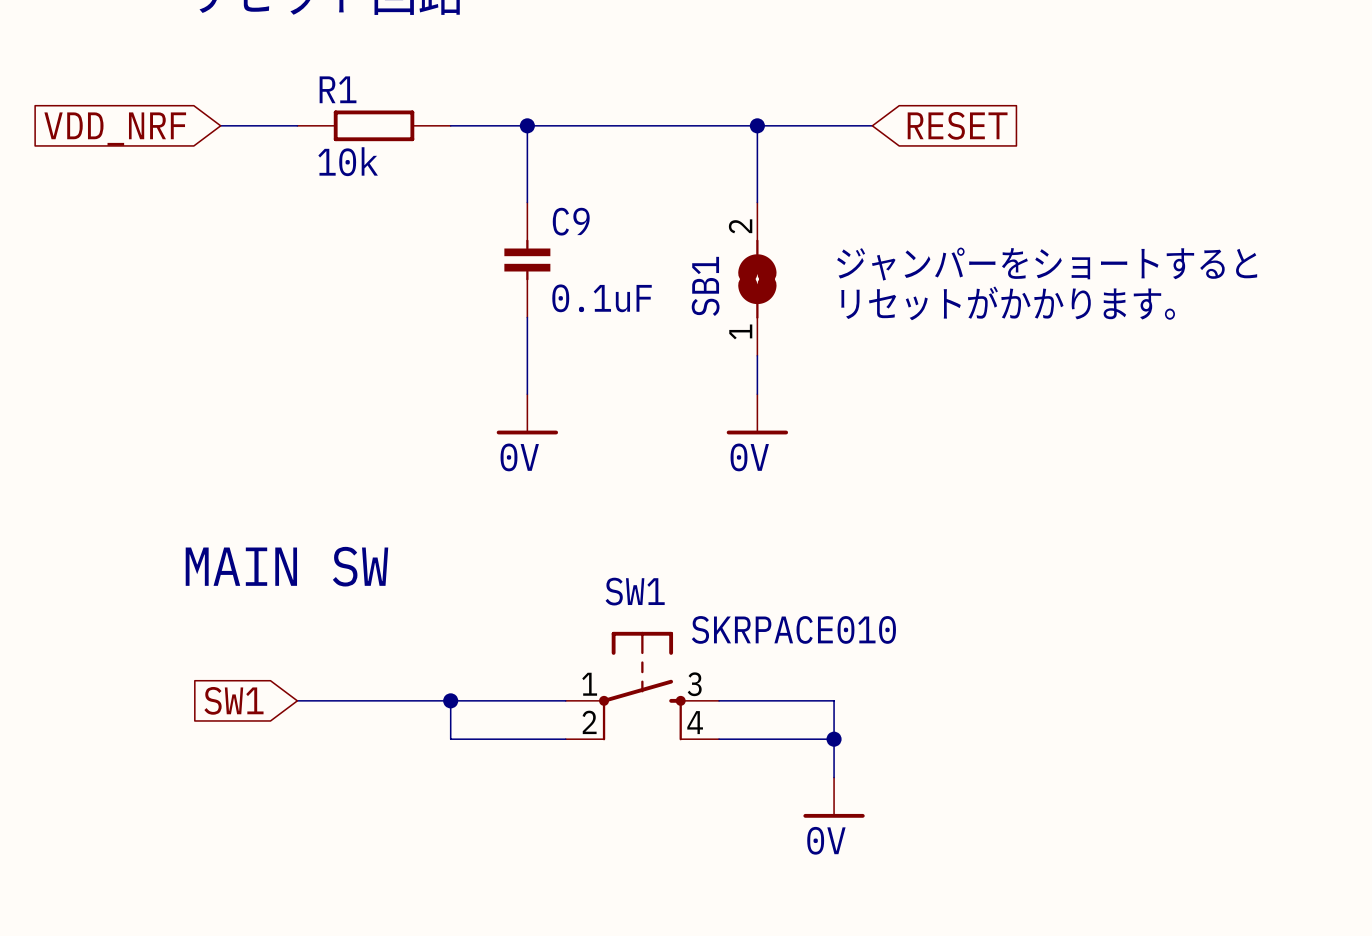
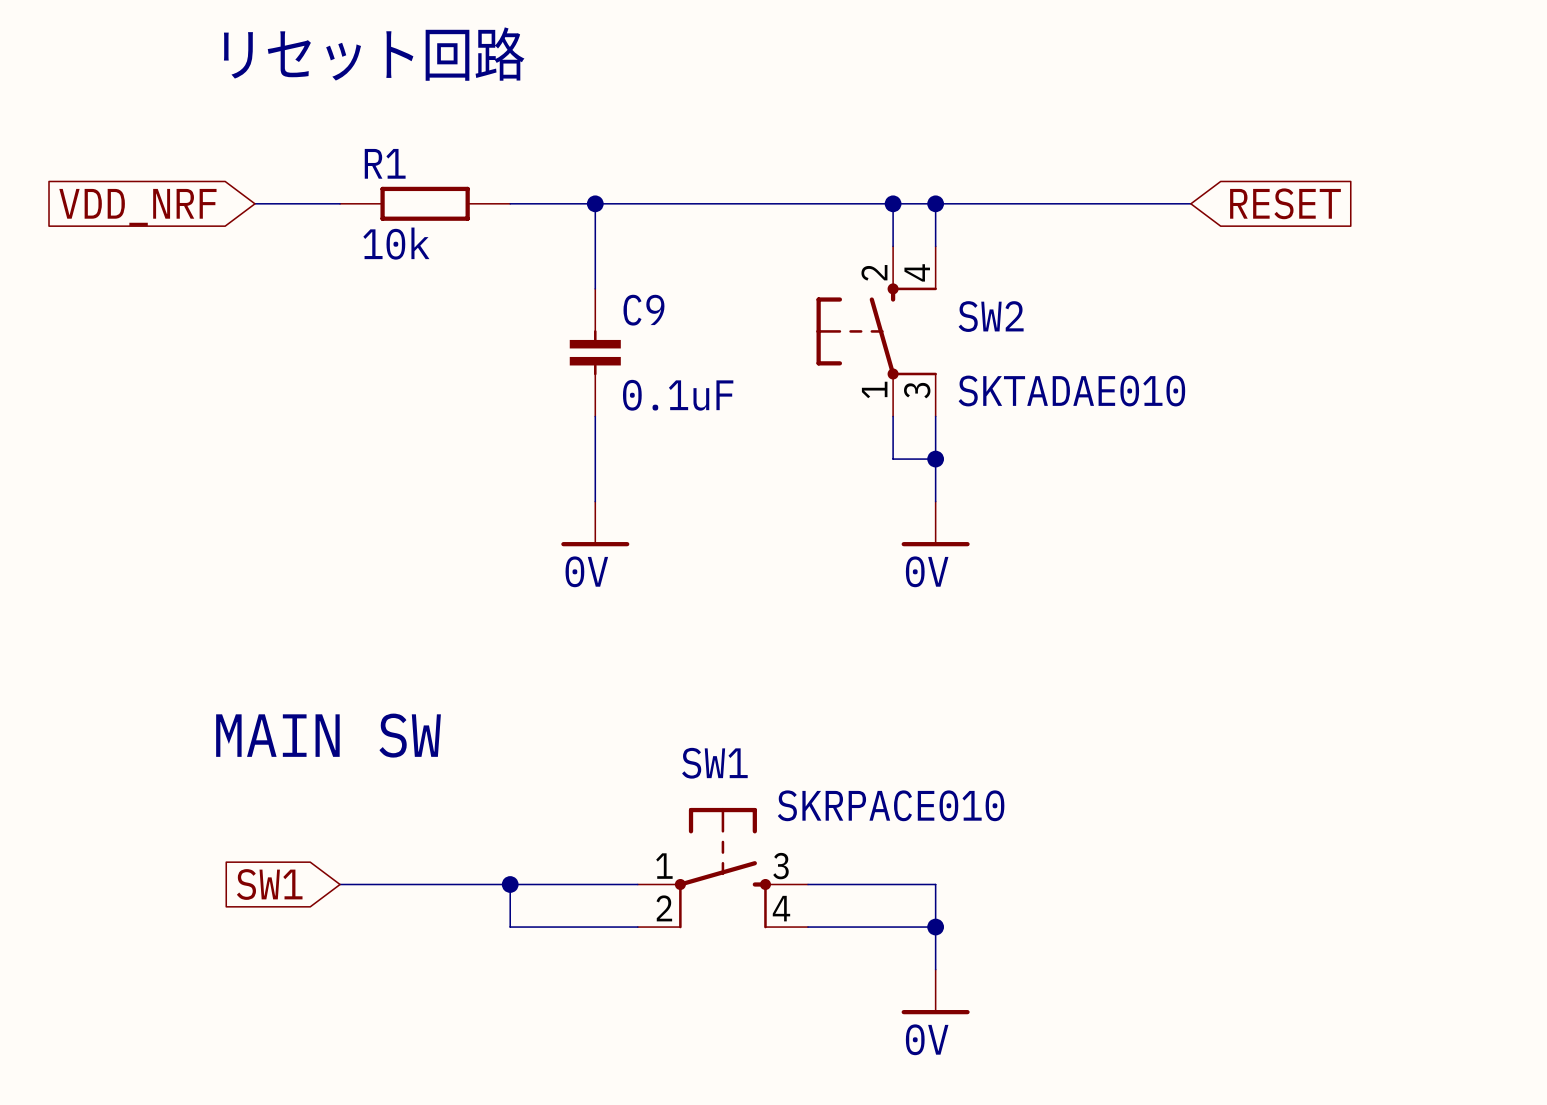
wire: (757, 125) (757, 202) -> (935, 416) (935, 501)
junction: (757, 125) -> none
junction: none -> (893, 203)
wire: none -> (935, 203) (935, 246)
junction: none -> (935, 203)
wire: none -> (978, 203) (1190, 203)
global label position: RESET (957, 125) -> RESET (1285, 203)
SW2: none -> SKTADAE010 (876, 331)
text: ジャンパーをショートすると (1047, 264) -> none
SB1: (757, 279) -> none
text: リセットがかかります。 (1008, 303) -> none
wire: none -> (893, 416) (893, 459) (935, 459)
wire: (757, 355) (757, 394) -> (893, 203) (893, 246)
junction: none -> (935, 459)
power symbol position: 0V (757, 414) -> 0V (935, 523)
text position: MAIN SW (286, 566) -> MAIN SW (328, 735)
SW1 position: (642, 686) -> (722, 868)
global label position: SW1 (233, 700) -> SW1 (269, 884)
wire: (297, 700) (565, 700) -> none
wire: (450, 700) (450, 739) -> none
junction position: (450, 700) -> (510, 884)
wire: (719, 700) (834, 700) (834, 739) -> (808, 927) (935, 927) (935, 969)
wire: none -> (340, 884) (510, 884) (510, 927) (637, 927)
junction position: (834, 739) -> (935, 927)
power symbol position: 0V (834, 797) -> 0V (935, 991)

